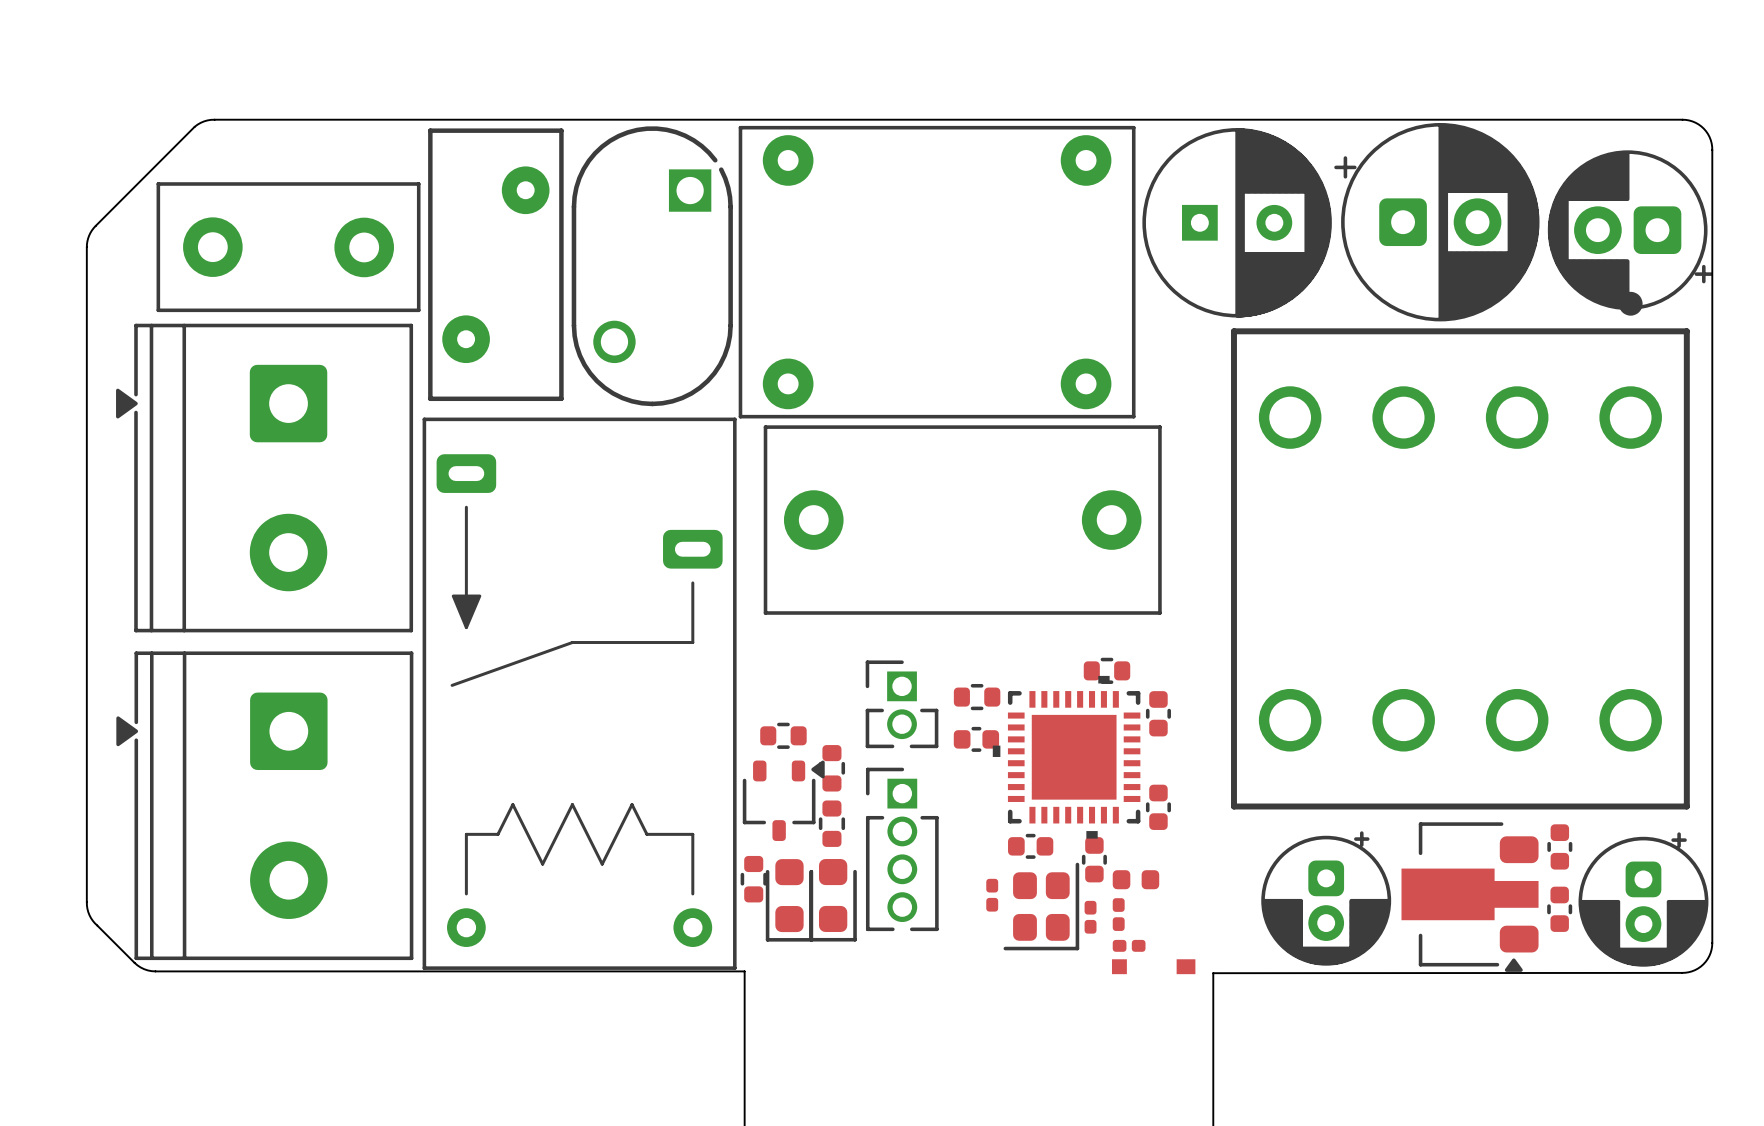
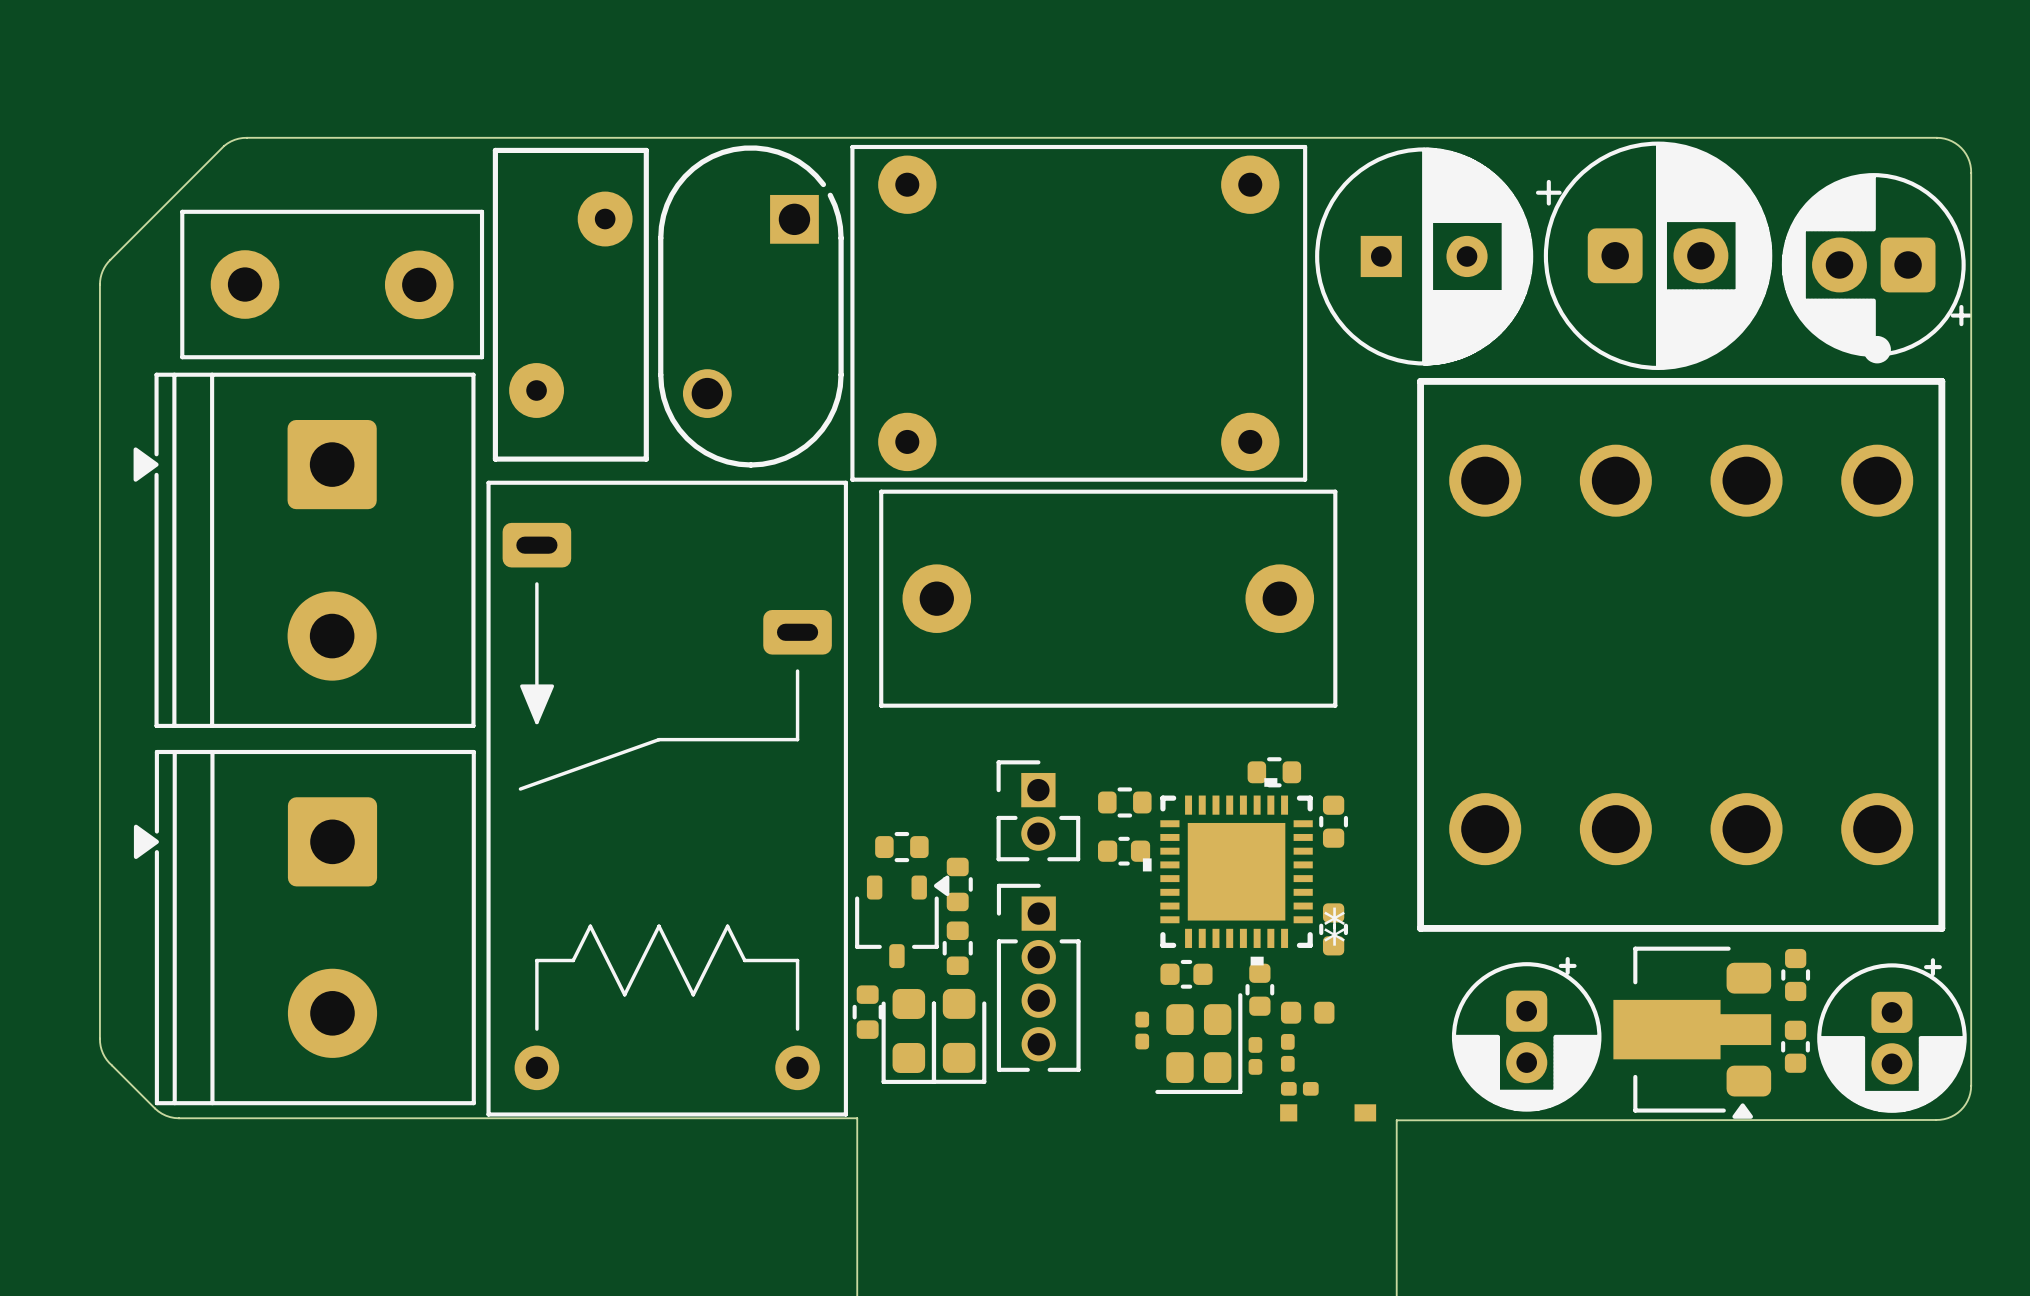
part footprint: [992, 675, 1141, 839] -> [1142, 778, 1313, 966]

